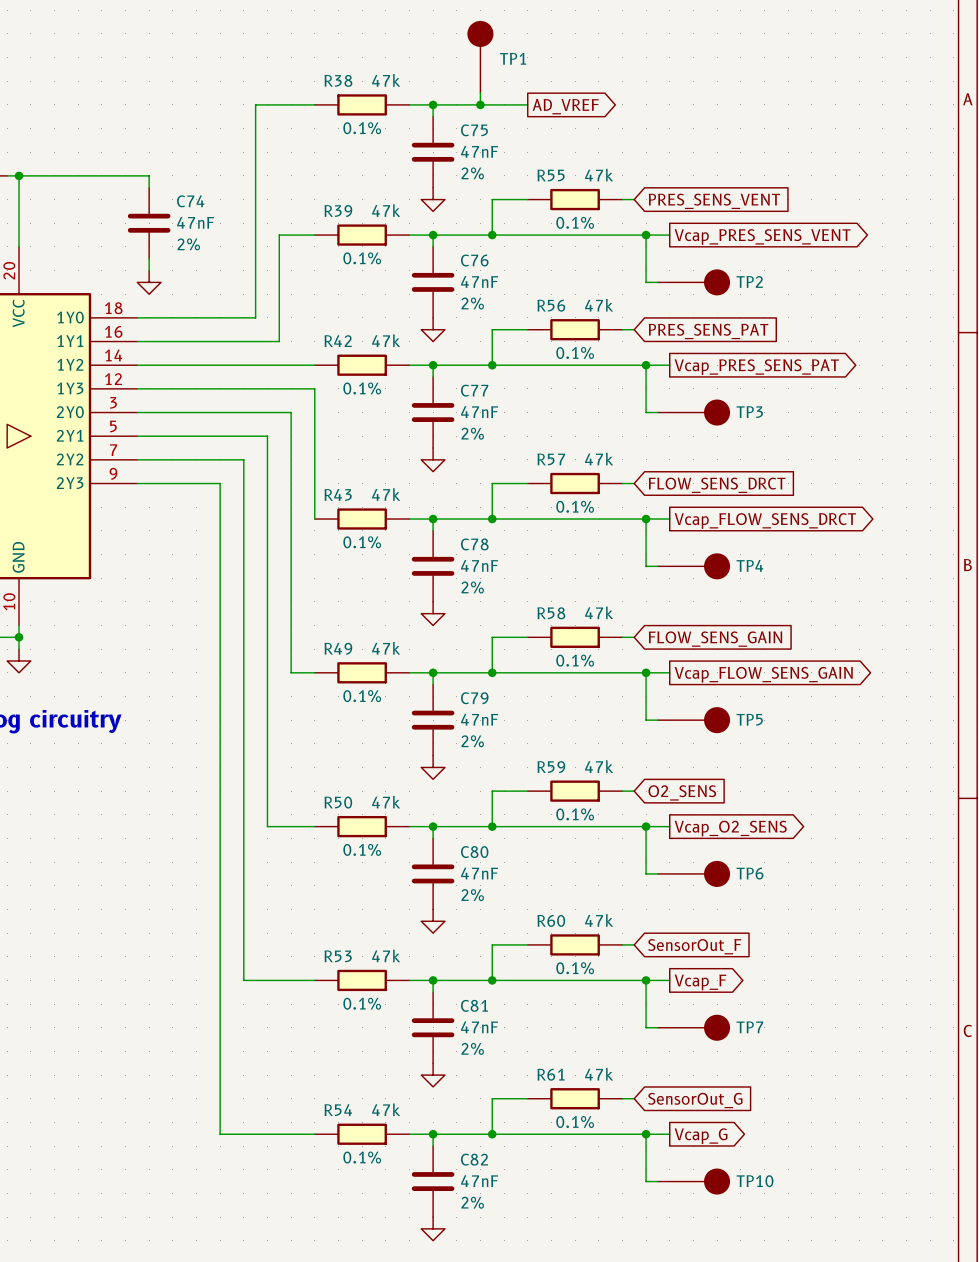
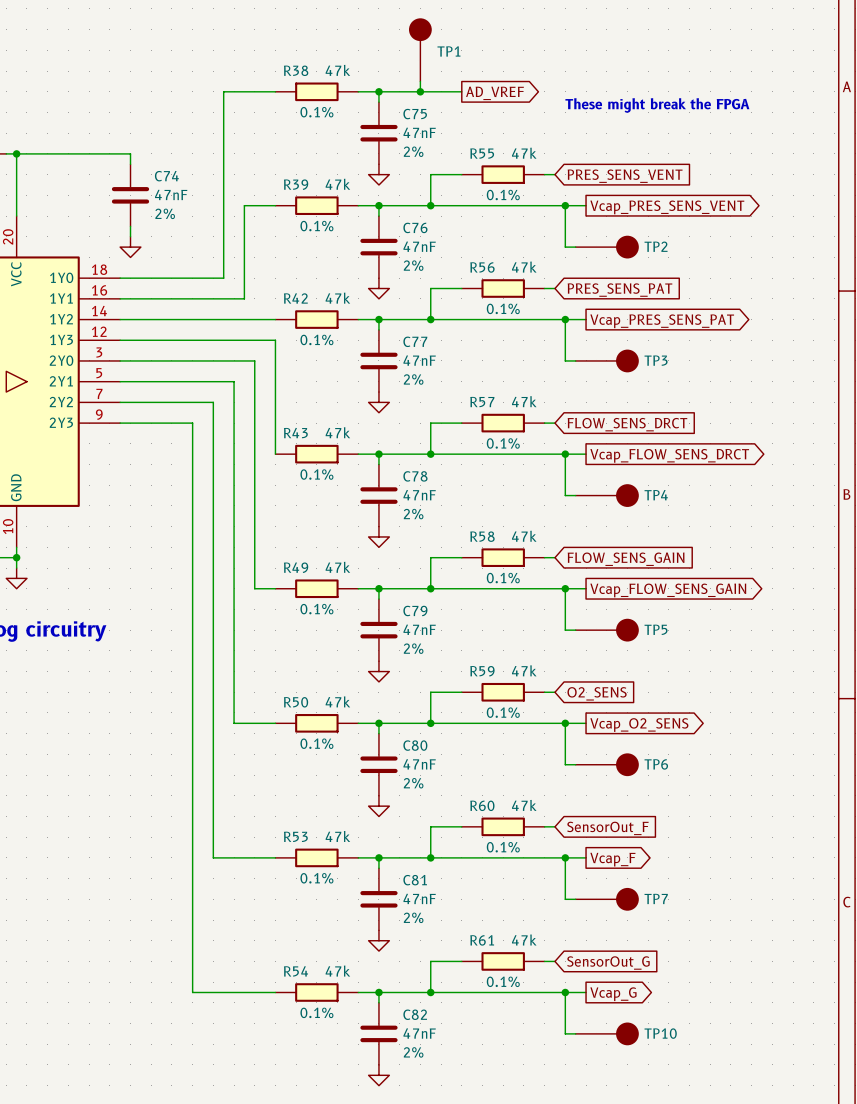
text: none -> These might break the FPGA (657, 105)

